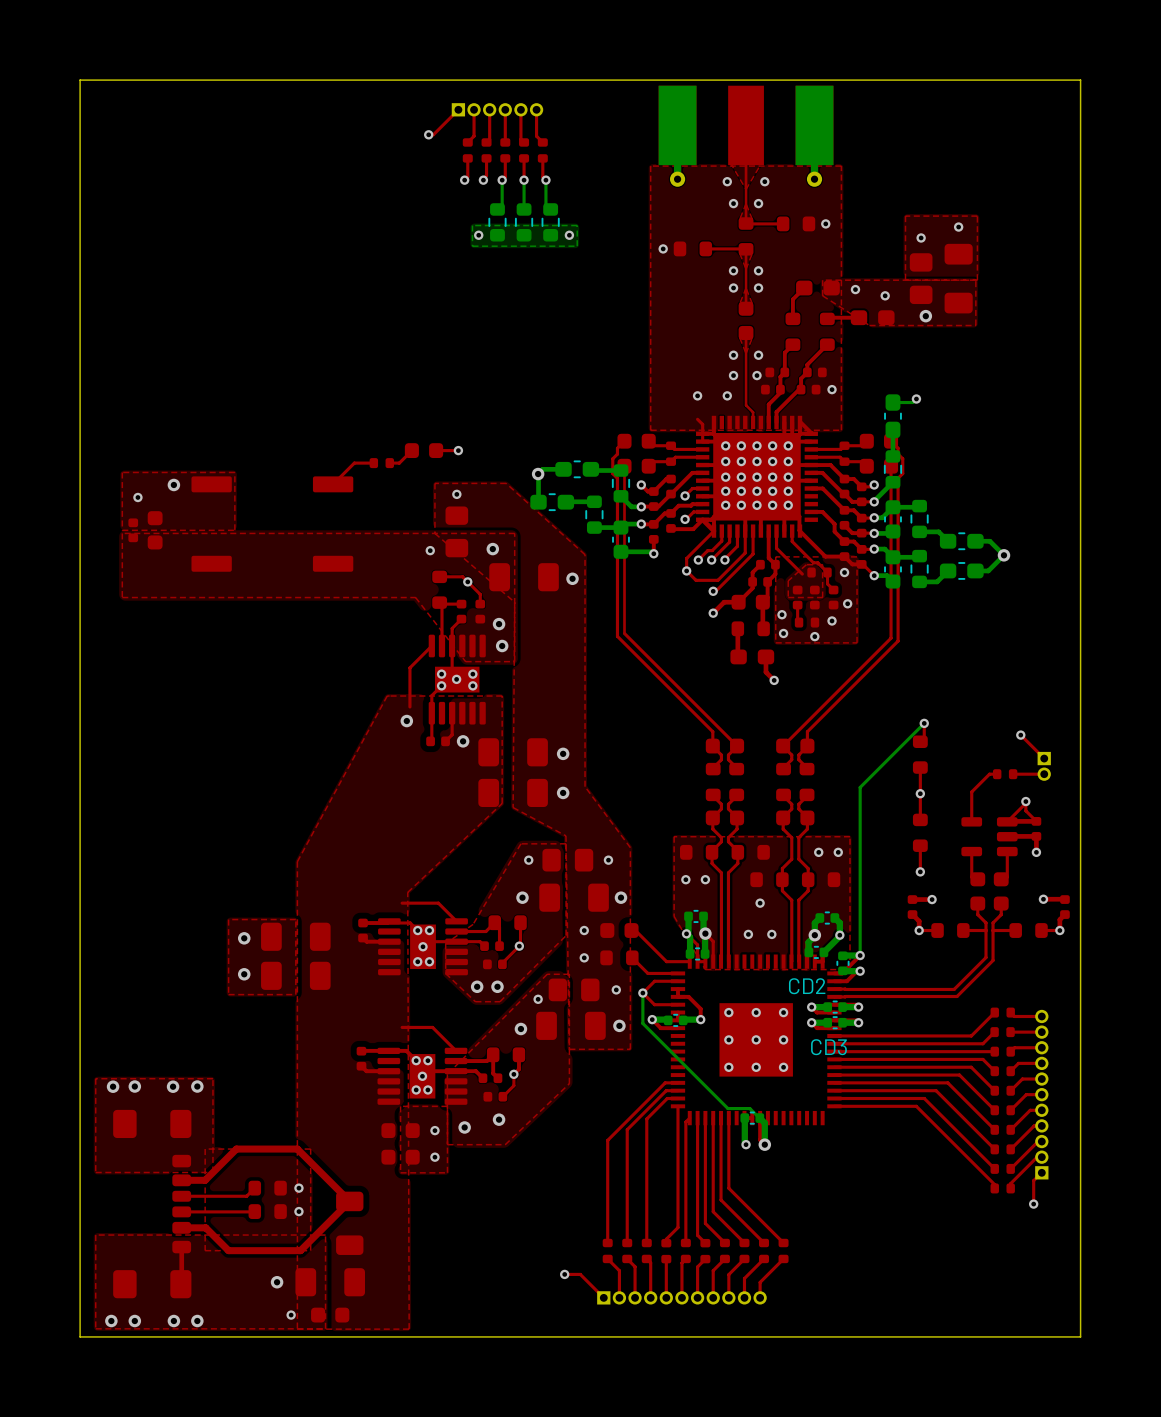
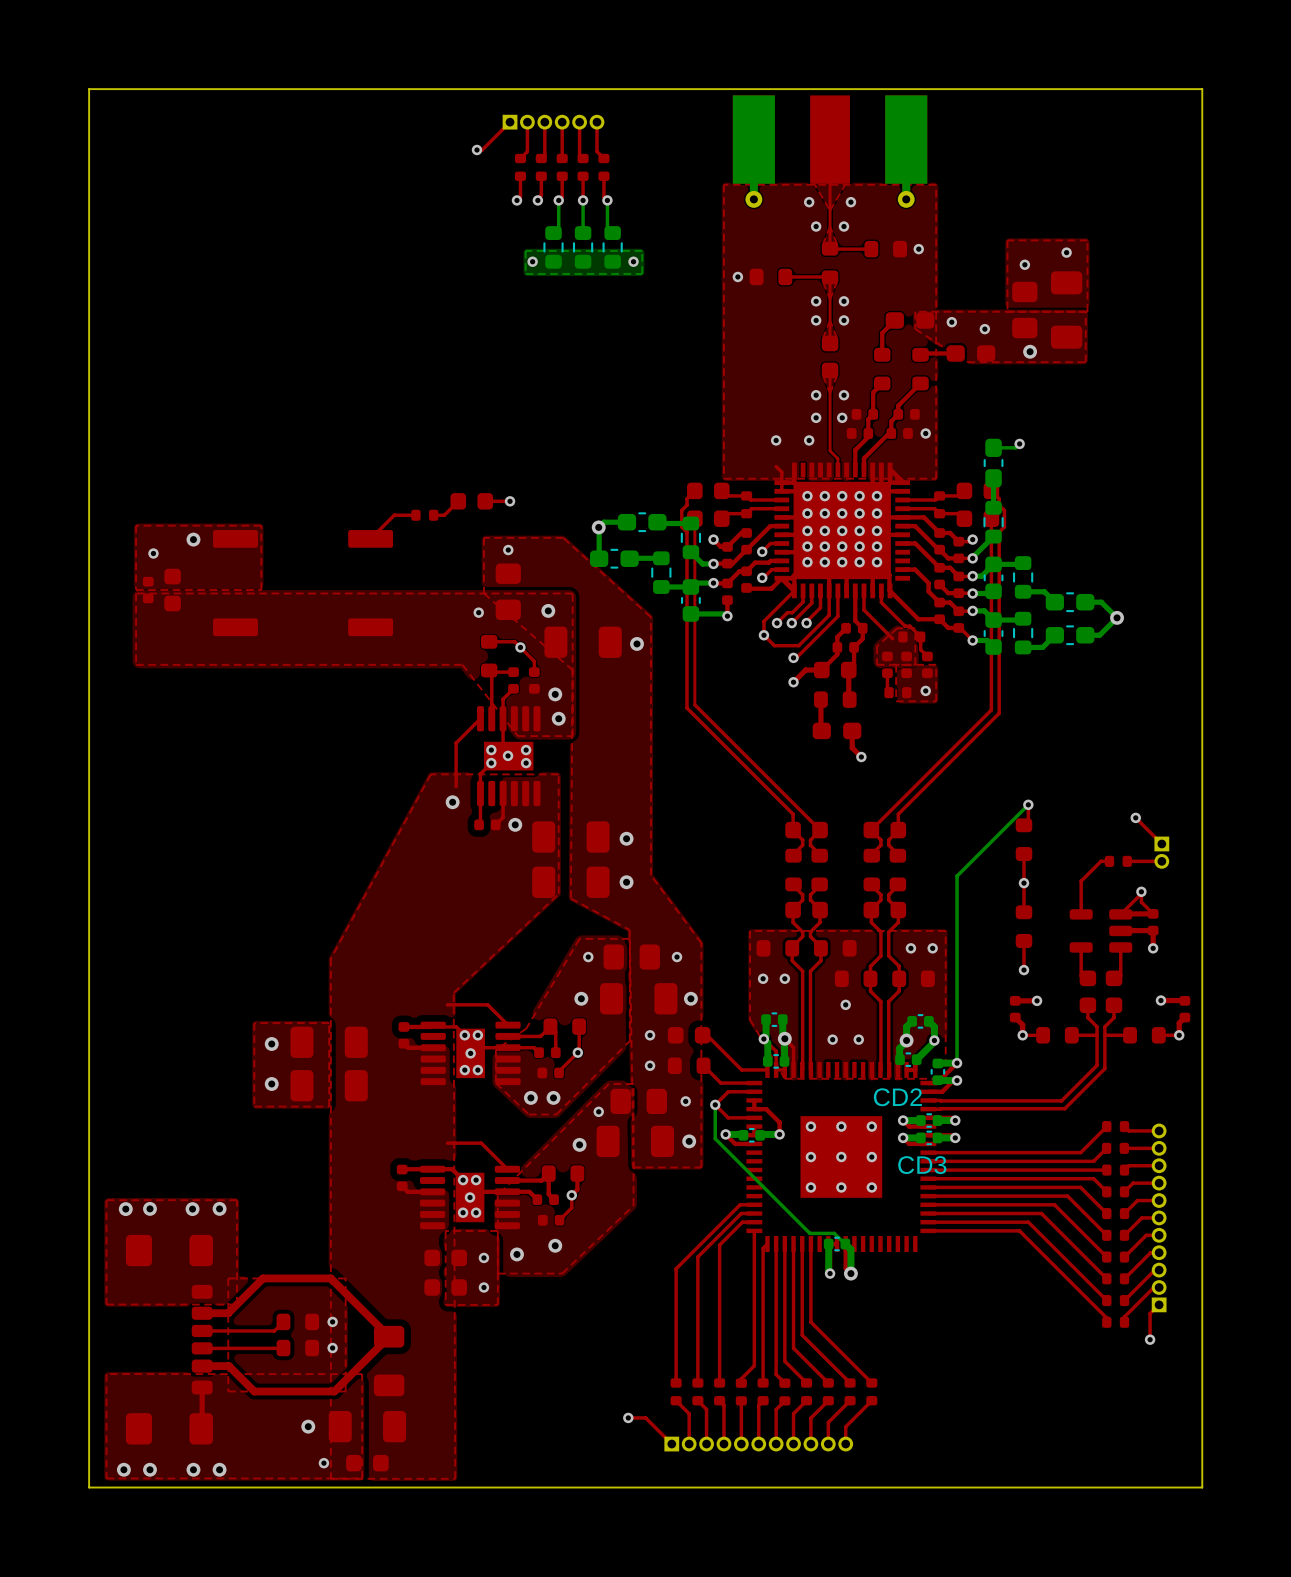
top zone outline: (857, 556) (857, 642) (775, 642) (775, 556) (857, 556) -> none
via: (844, 572) -> none
top zone outline: none -> (915, 664) (936, 664) (936, 701) (896, 701) (896, 664)
via: (847, 603) -> none
via: (782, 614) -> none
via: (783, 633) -> none
via: (814, 636) -> none

